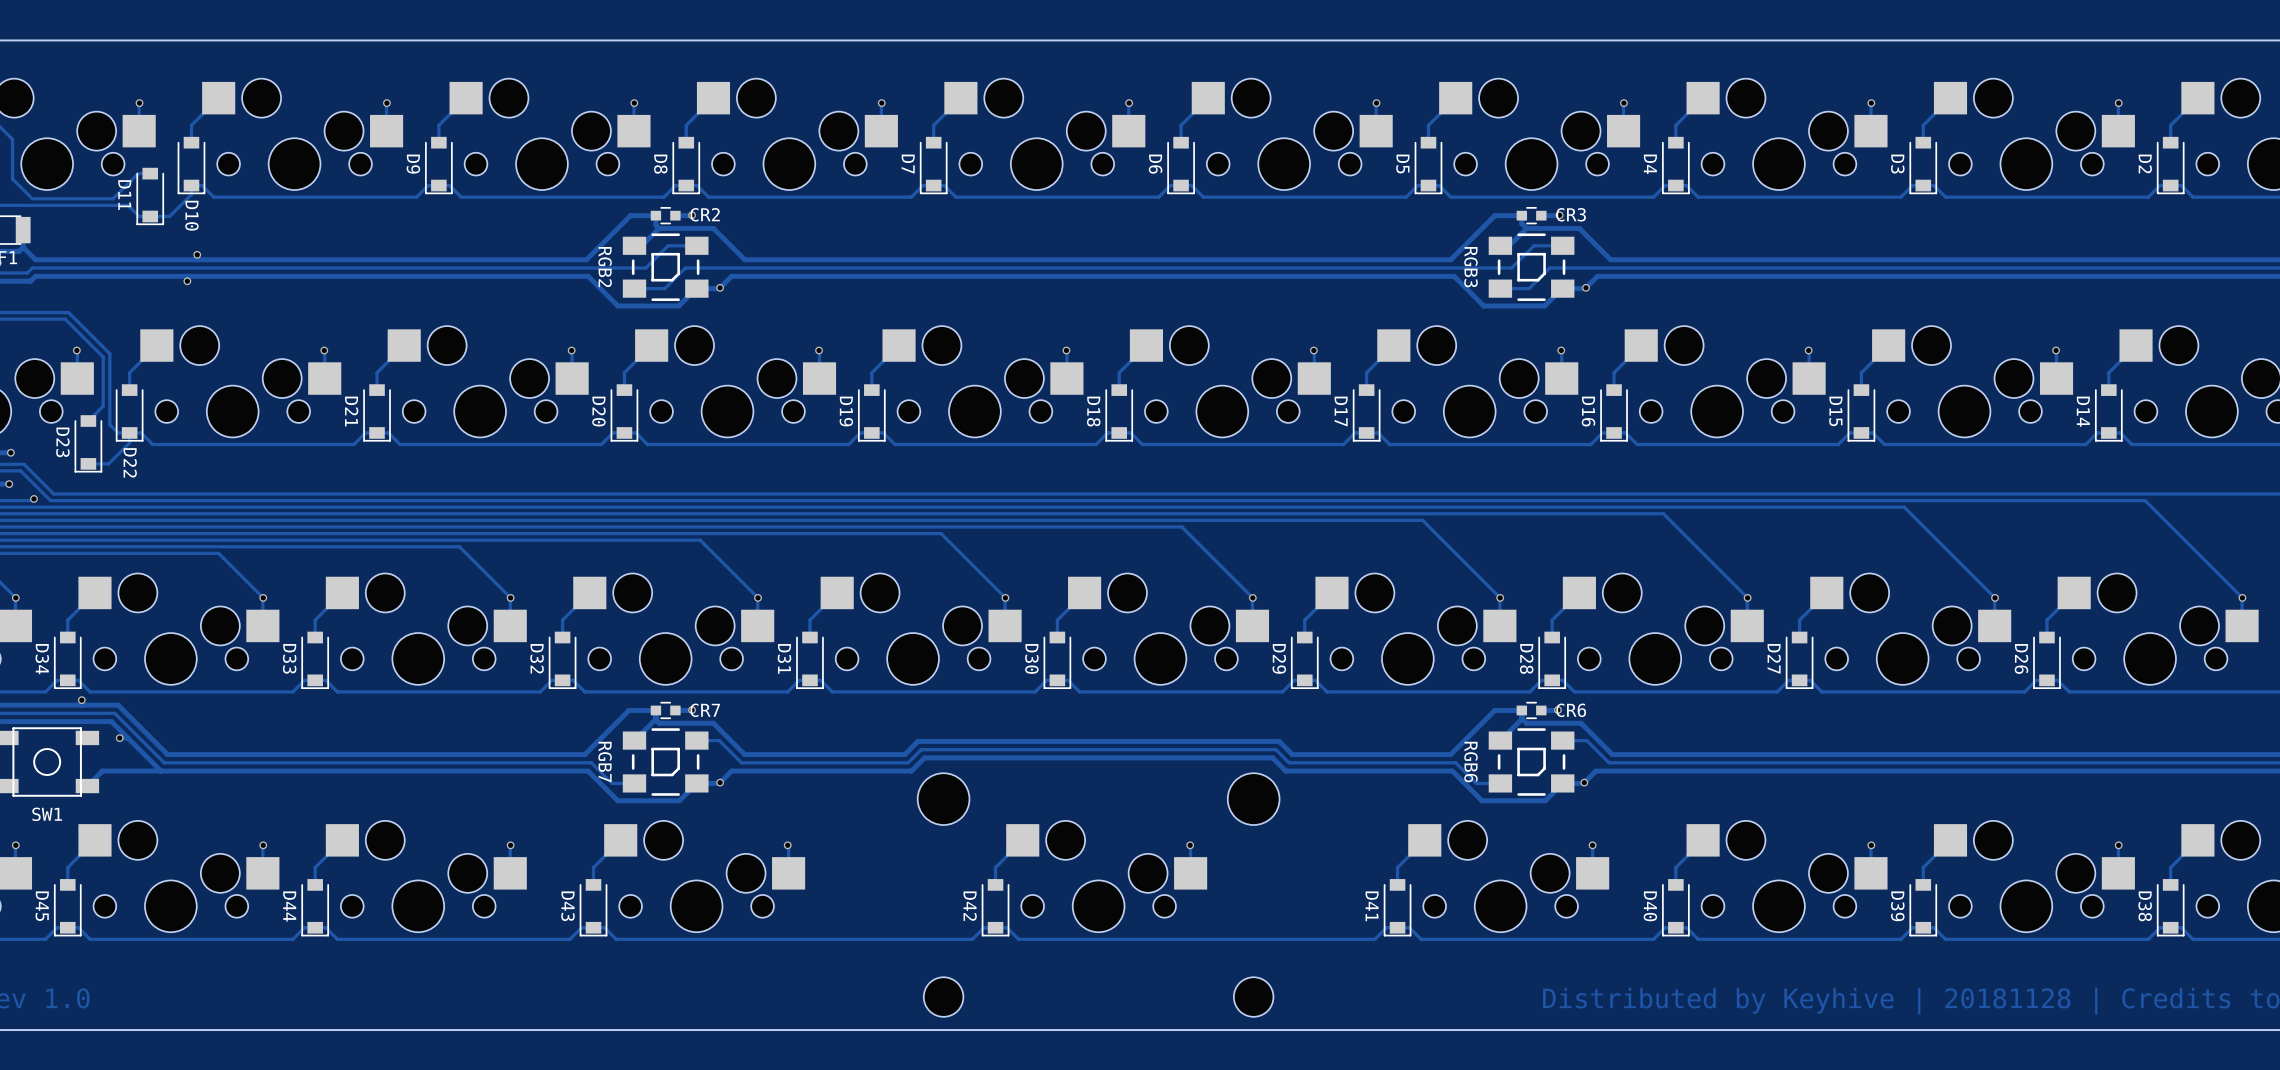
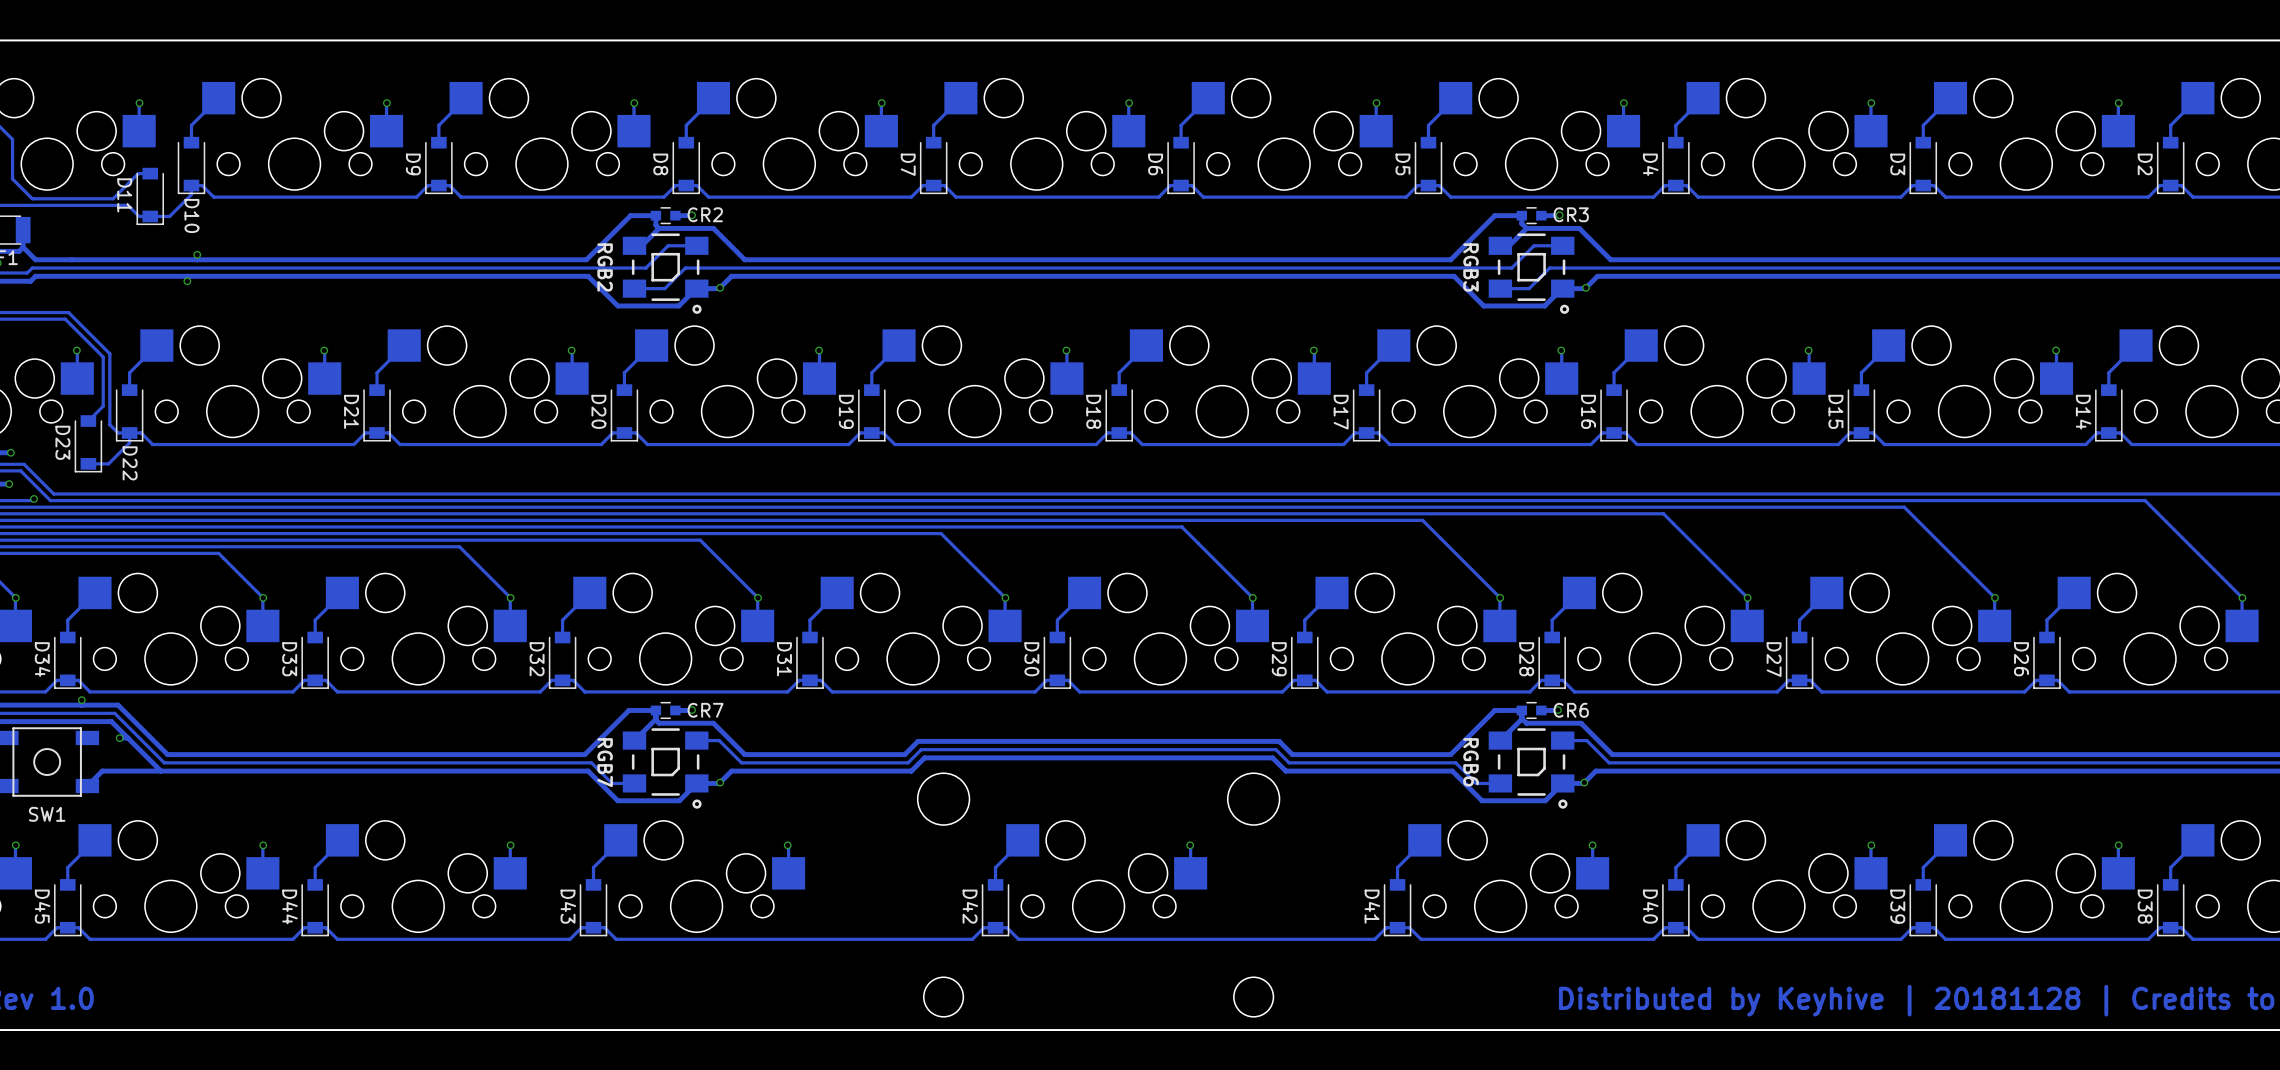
drawing: none -> [692, 304, 702, 314]
drawing: none -> [1559, 304, 1570, 314]
drawing: none -> [692, 799, 702, 809]
drawing: none -> [1558, 799, 1568, 809]

